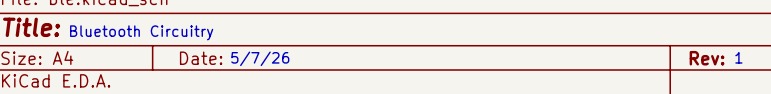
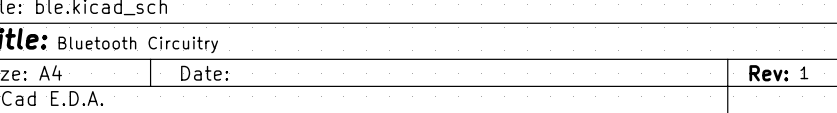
text: 5/7/26 (260, 58) -> none

